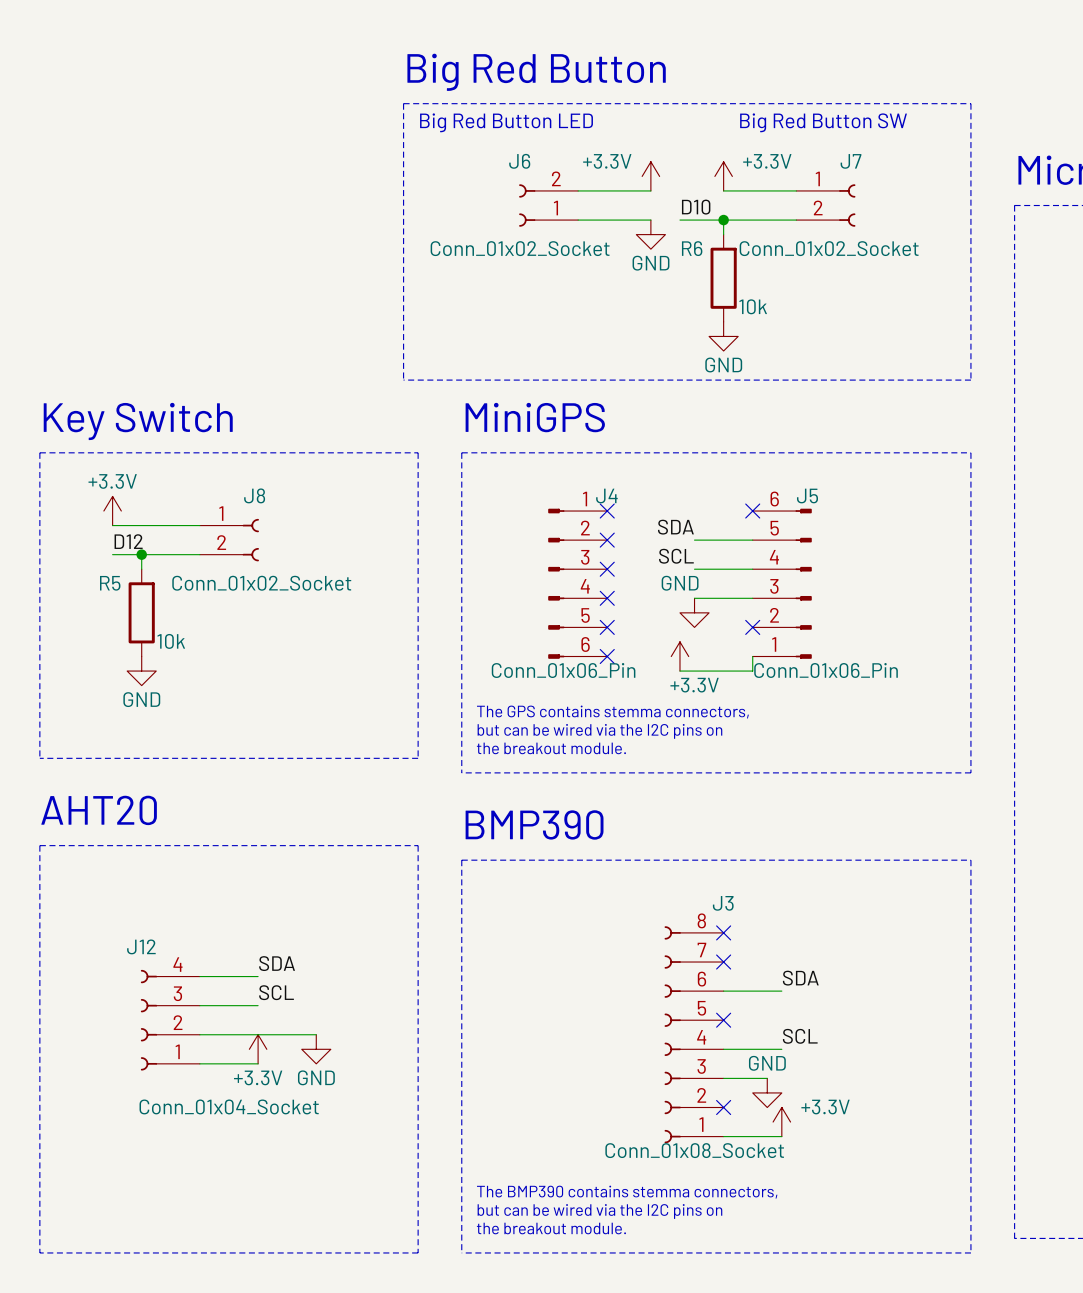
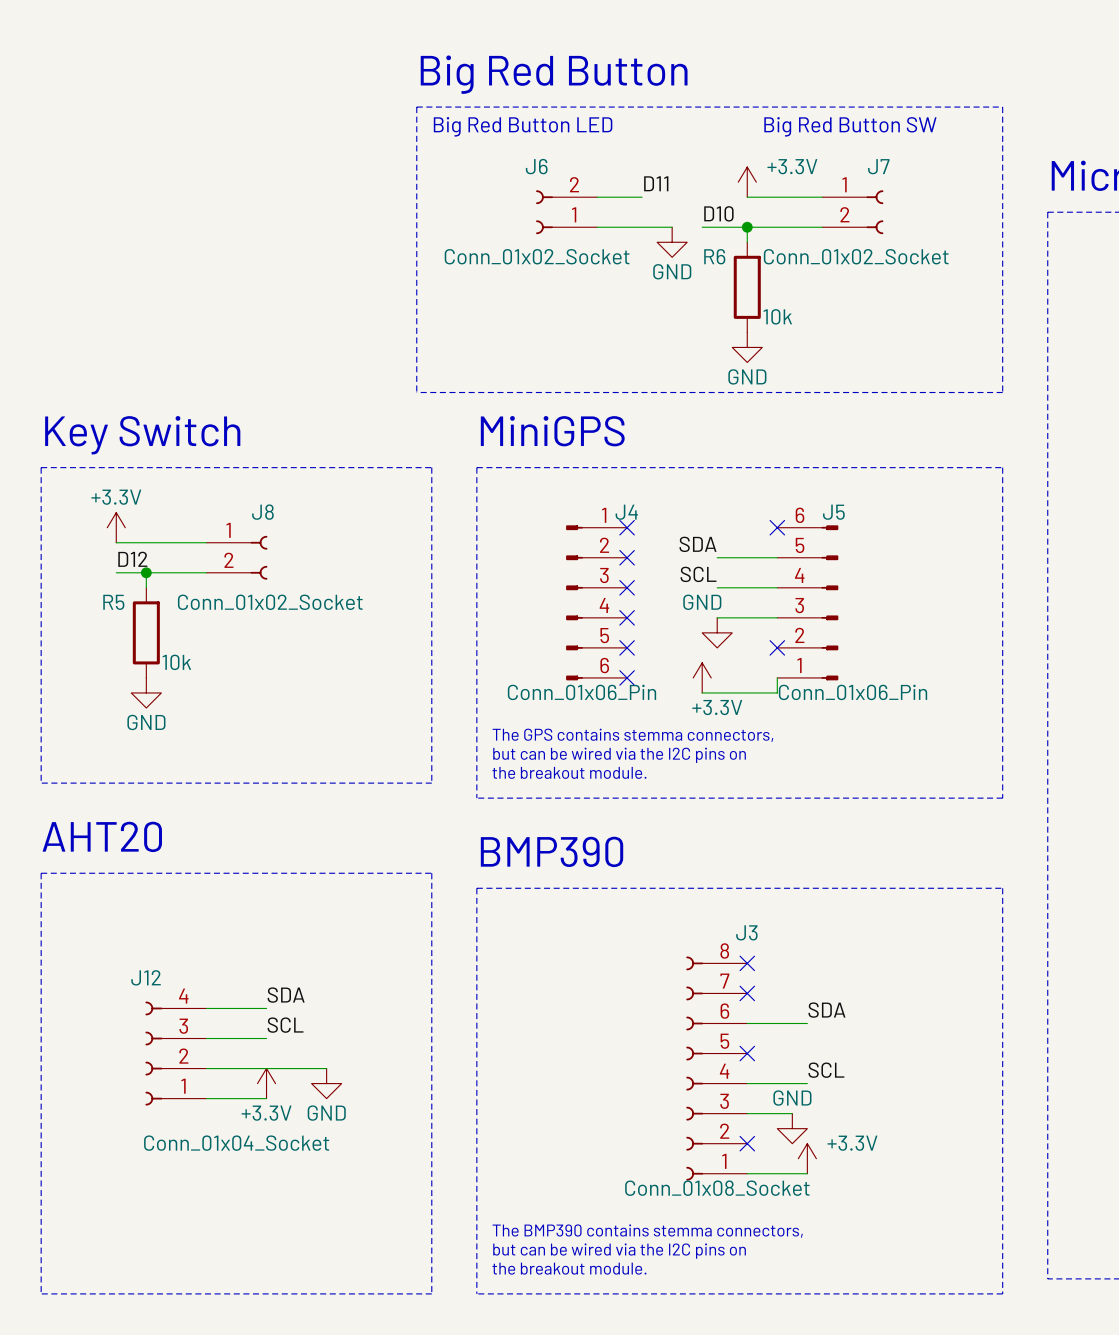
power symbol: +3.3V (650, 176) -> none
label: none -> D11 (656, 183)
wire: (621, 190) (650, 190) -> none

